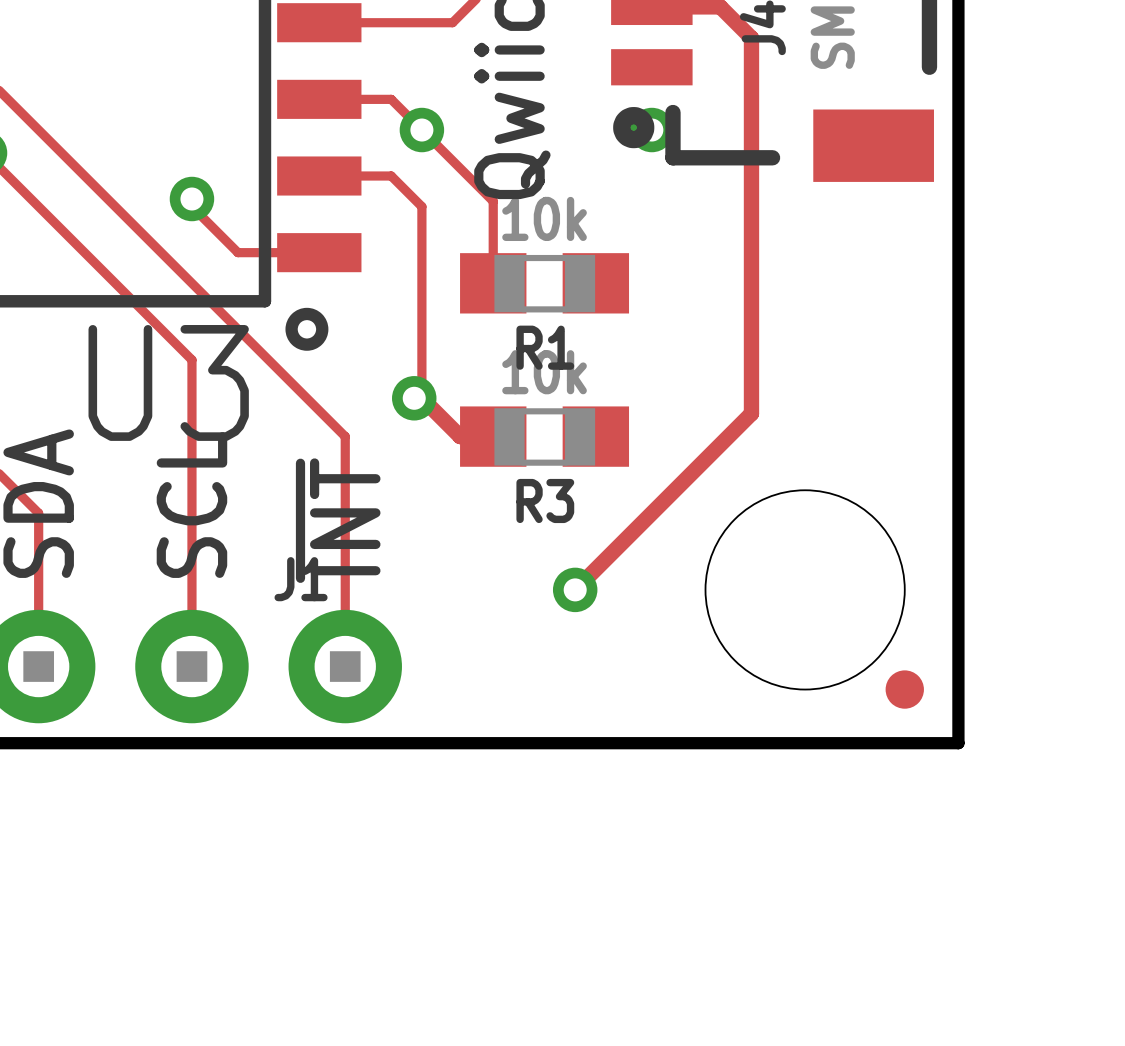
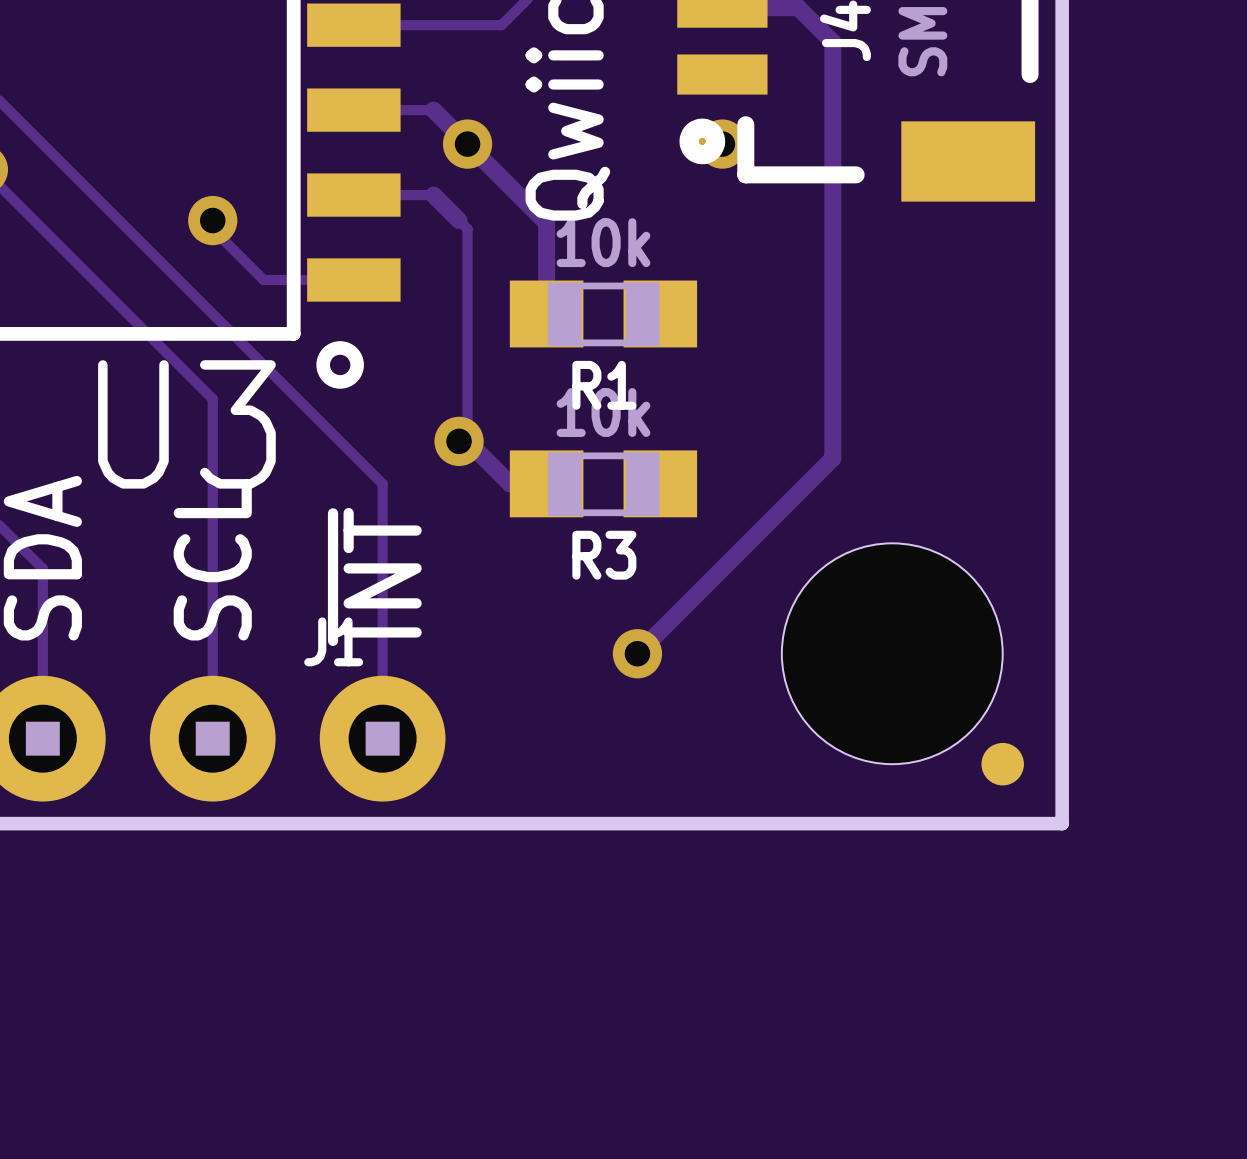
track width: thin (391, 99) (493, 201) (493, 283) -> thick (433, 110) (546, 223) (546, 313)
track width: thin (391, 176) (414, 199) -> thick (433, 195) (459, 220)

